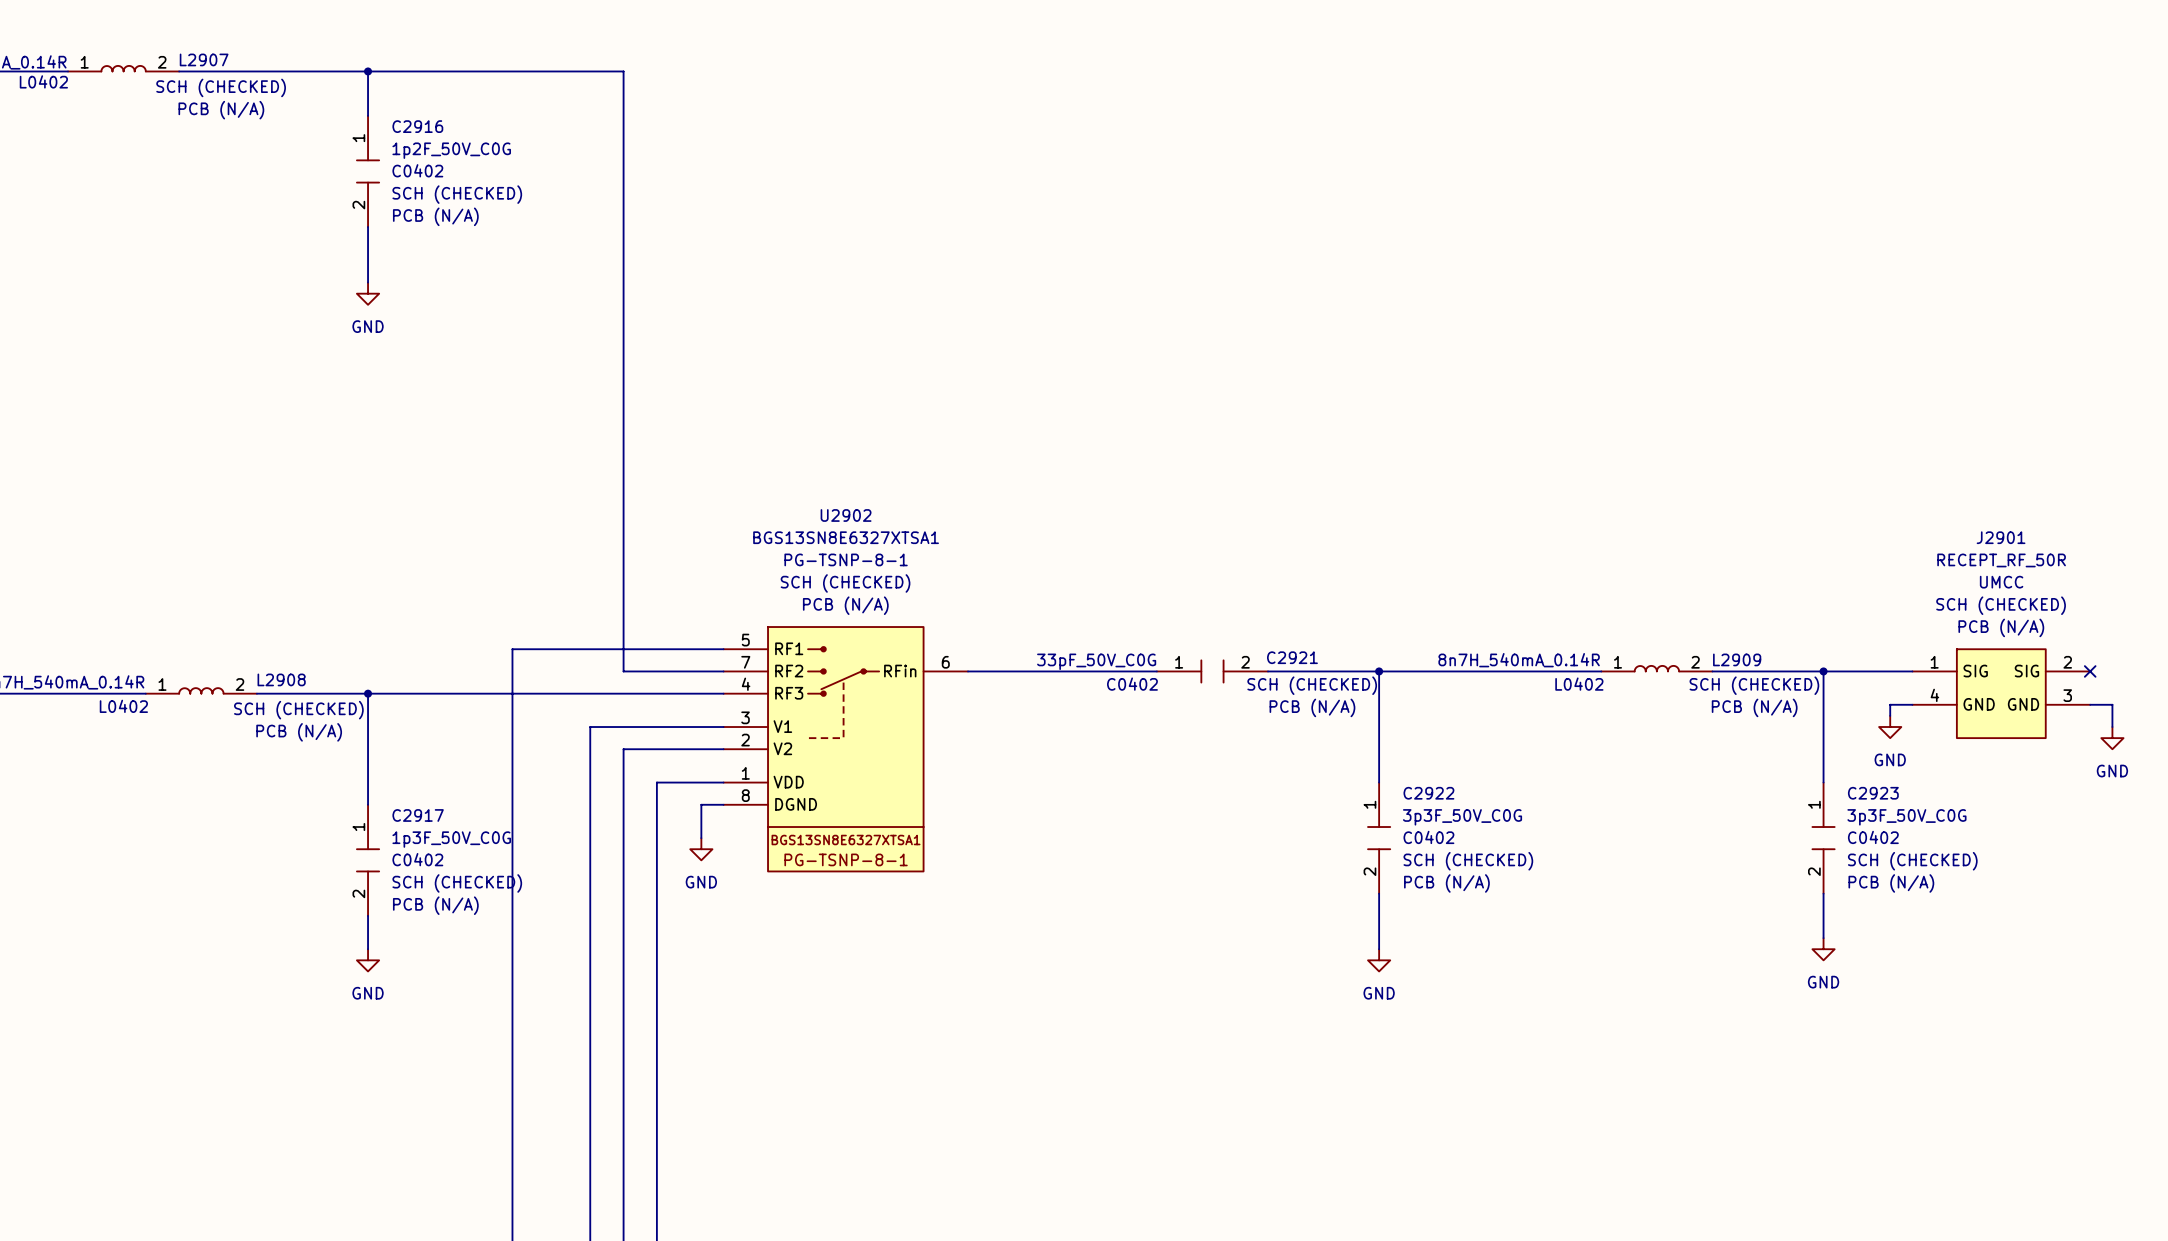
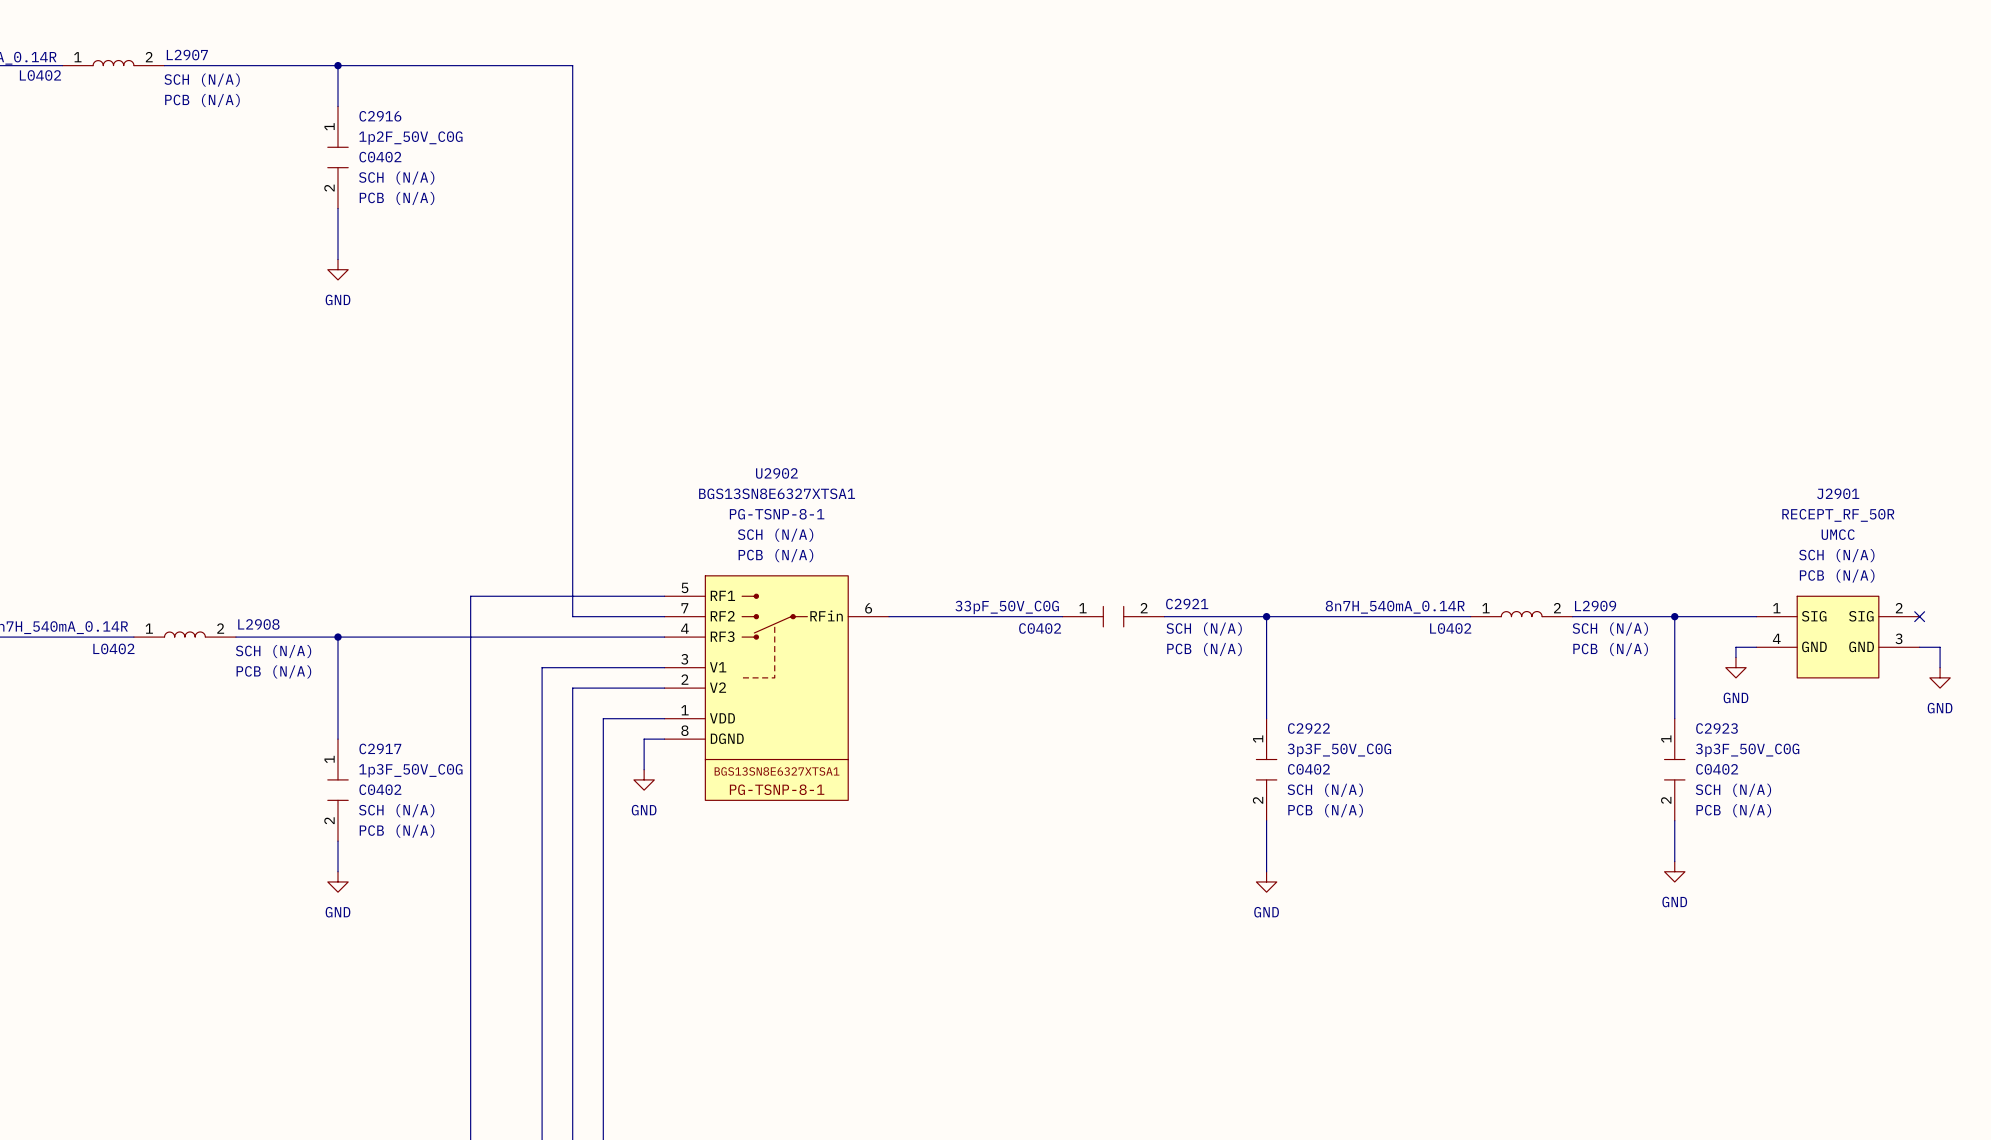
L2907 text: SCH (CHECKED) (221, 87) -> SCH (N/A) (202, 80)
C2916 text: SCH (CHECKED) (457, 194) -> SCH (N/A) (396, 178)
U2902 text: SCH (CHECKED) (845, 583) -> SCH (N/A) (775, 535)
J2901 text: SCH (CHECKED) (2001, 605) -> SCH (N/A) (1836, 555)
C2921 text: SCH (CHECKED) (1312, 685) -> SCH (N/A) (1204, 629)
L2909 text: SCH (CHECKED) (1754, 685) -> SCH (N/A) (1610, 629)
L2908 text: SCH (CHECKED) (298, 710) -> SCH (N/A) (273, 651)
C2922 text: SCH (CHECKED) (1468, 861) -> SCH (N/A) (1325, 790)
C2923 text: SCH (CHECKED) (1912, 861) -> SCH (N/A) (1733, 790)
C2917 text: SCH (CHECKED) (457, 883) -> SCH (N/A) (396, 810)

